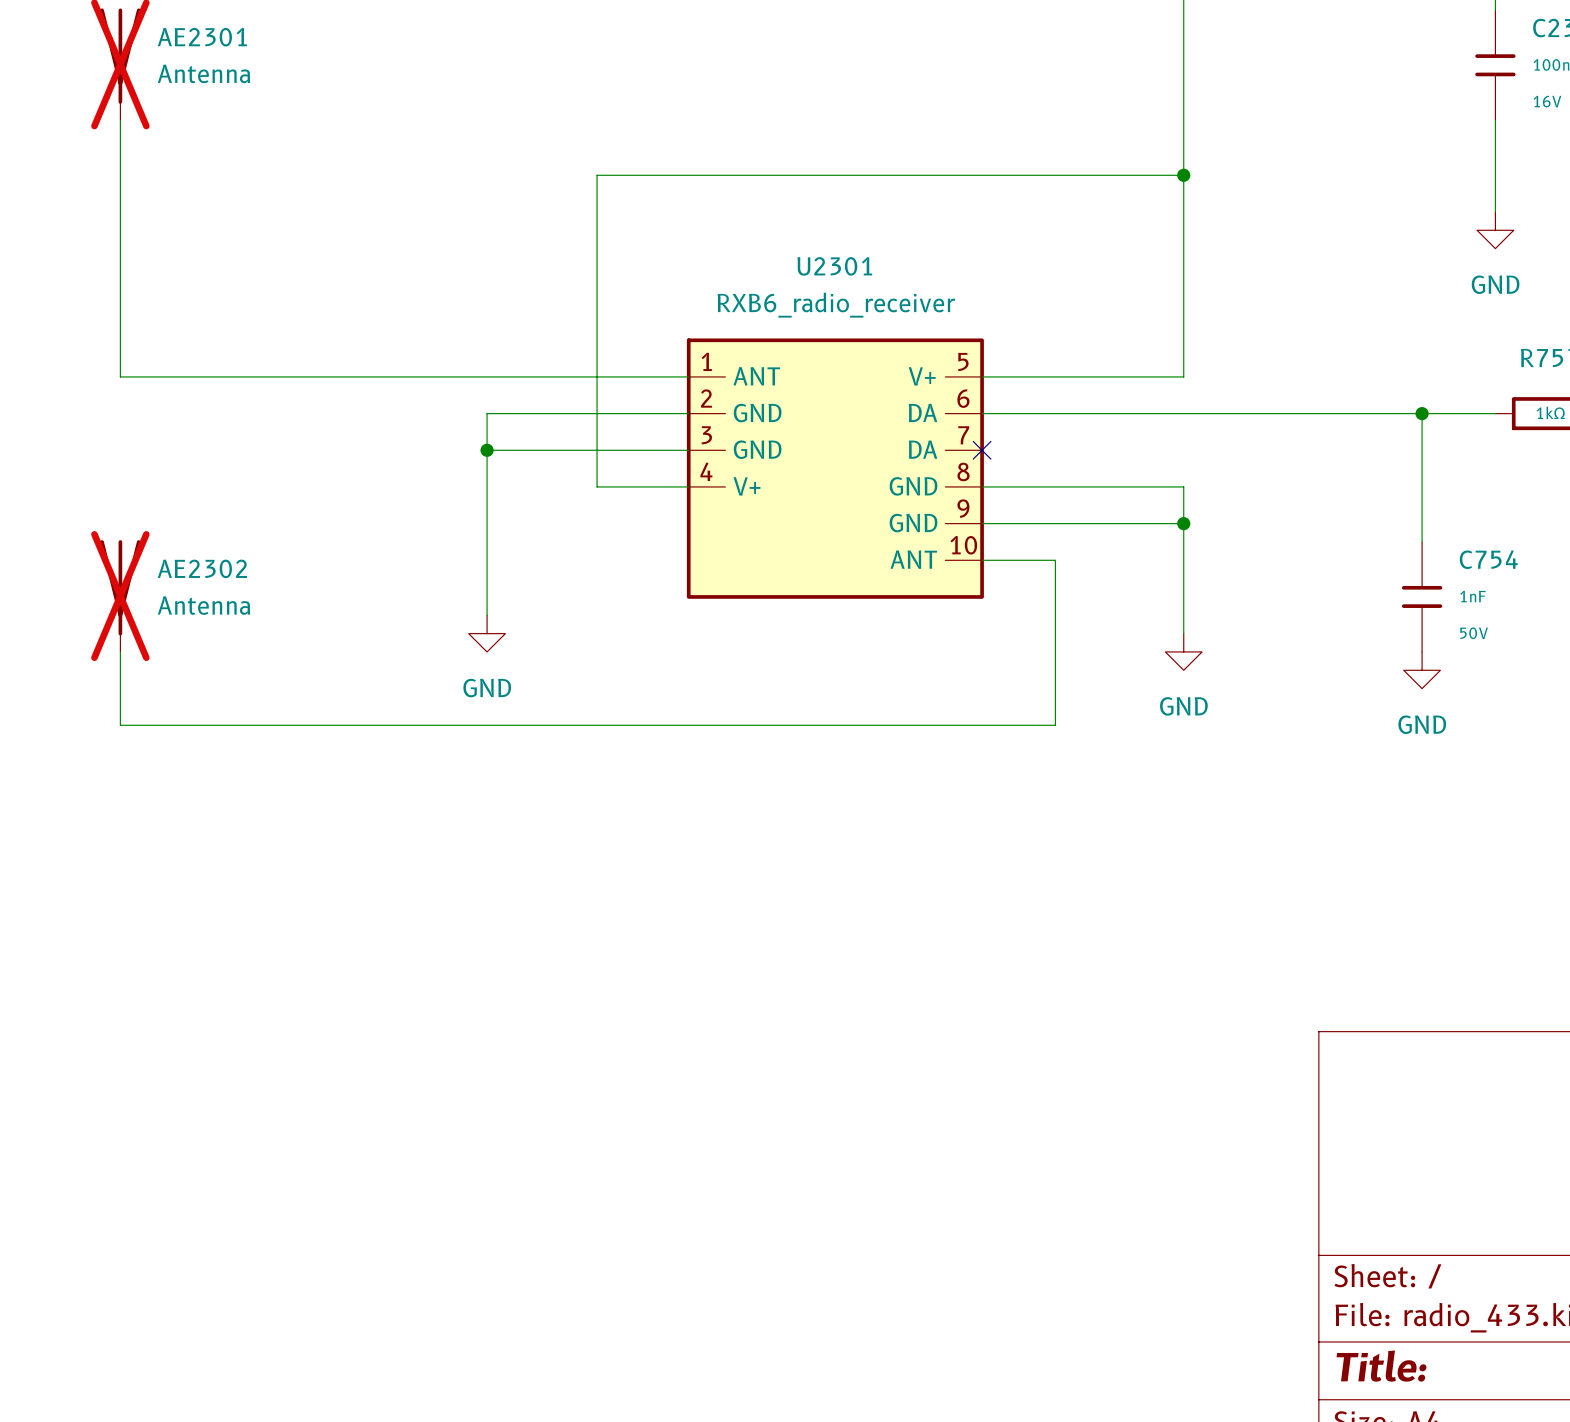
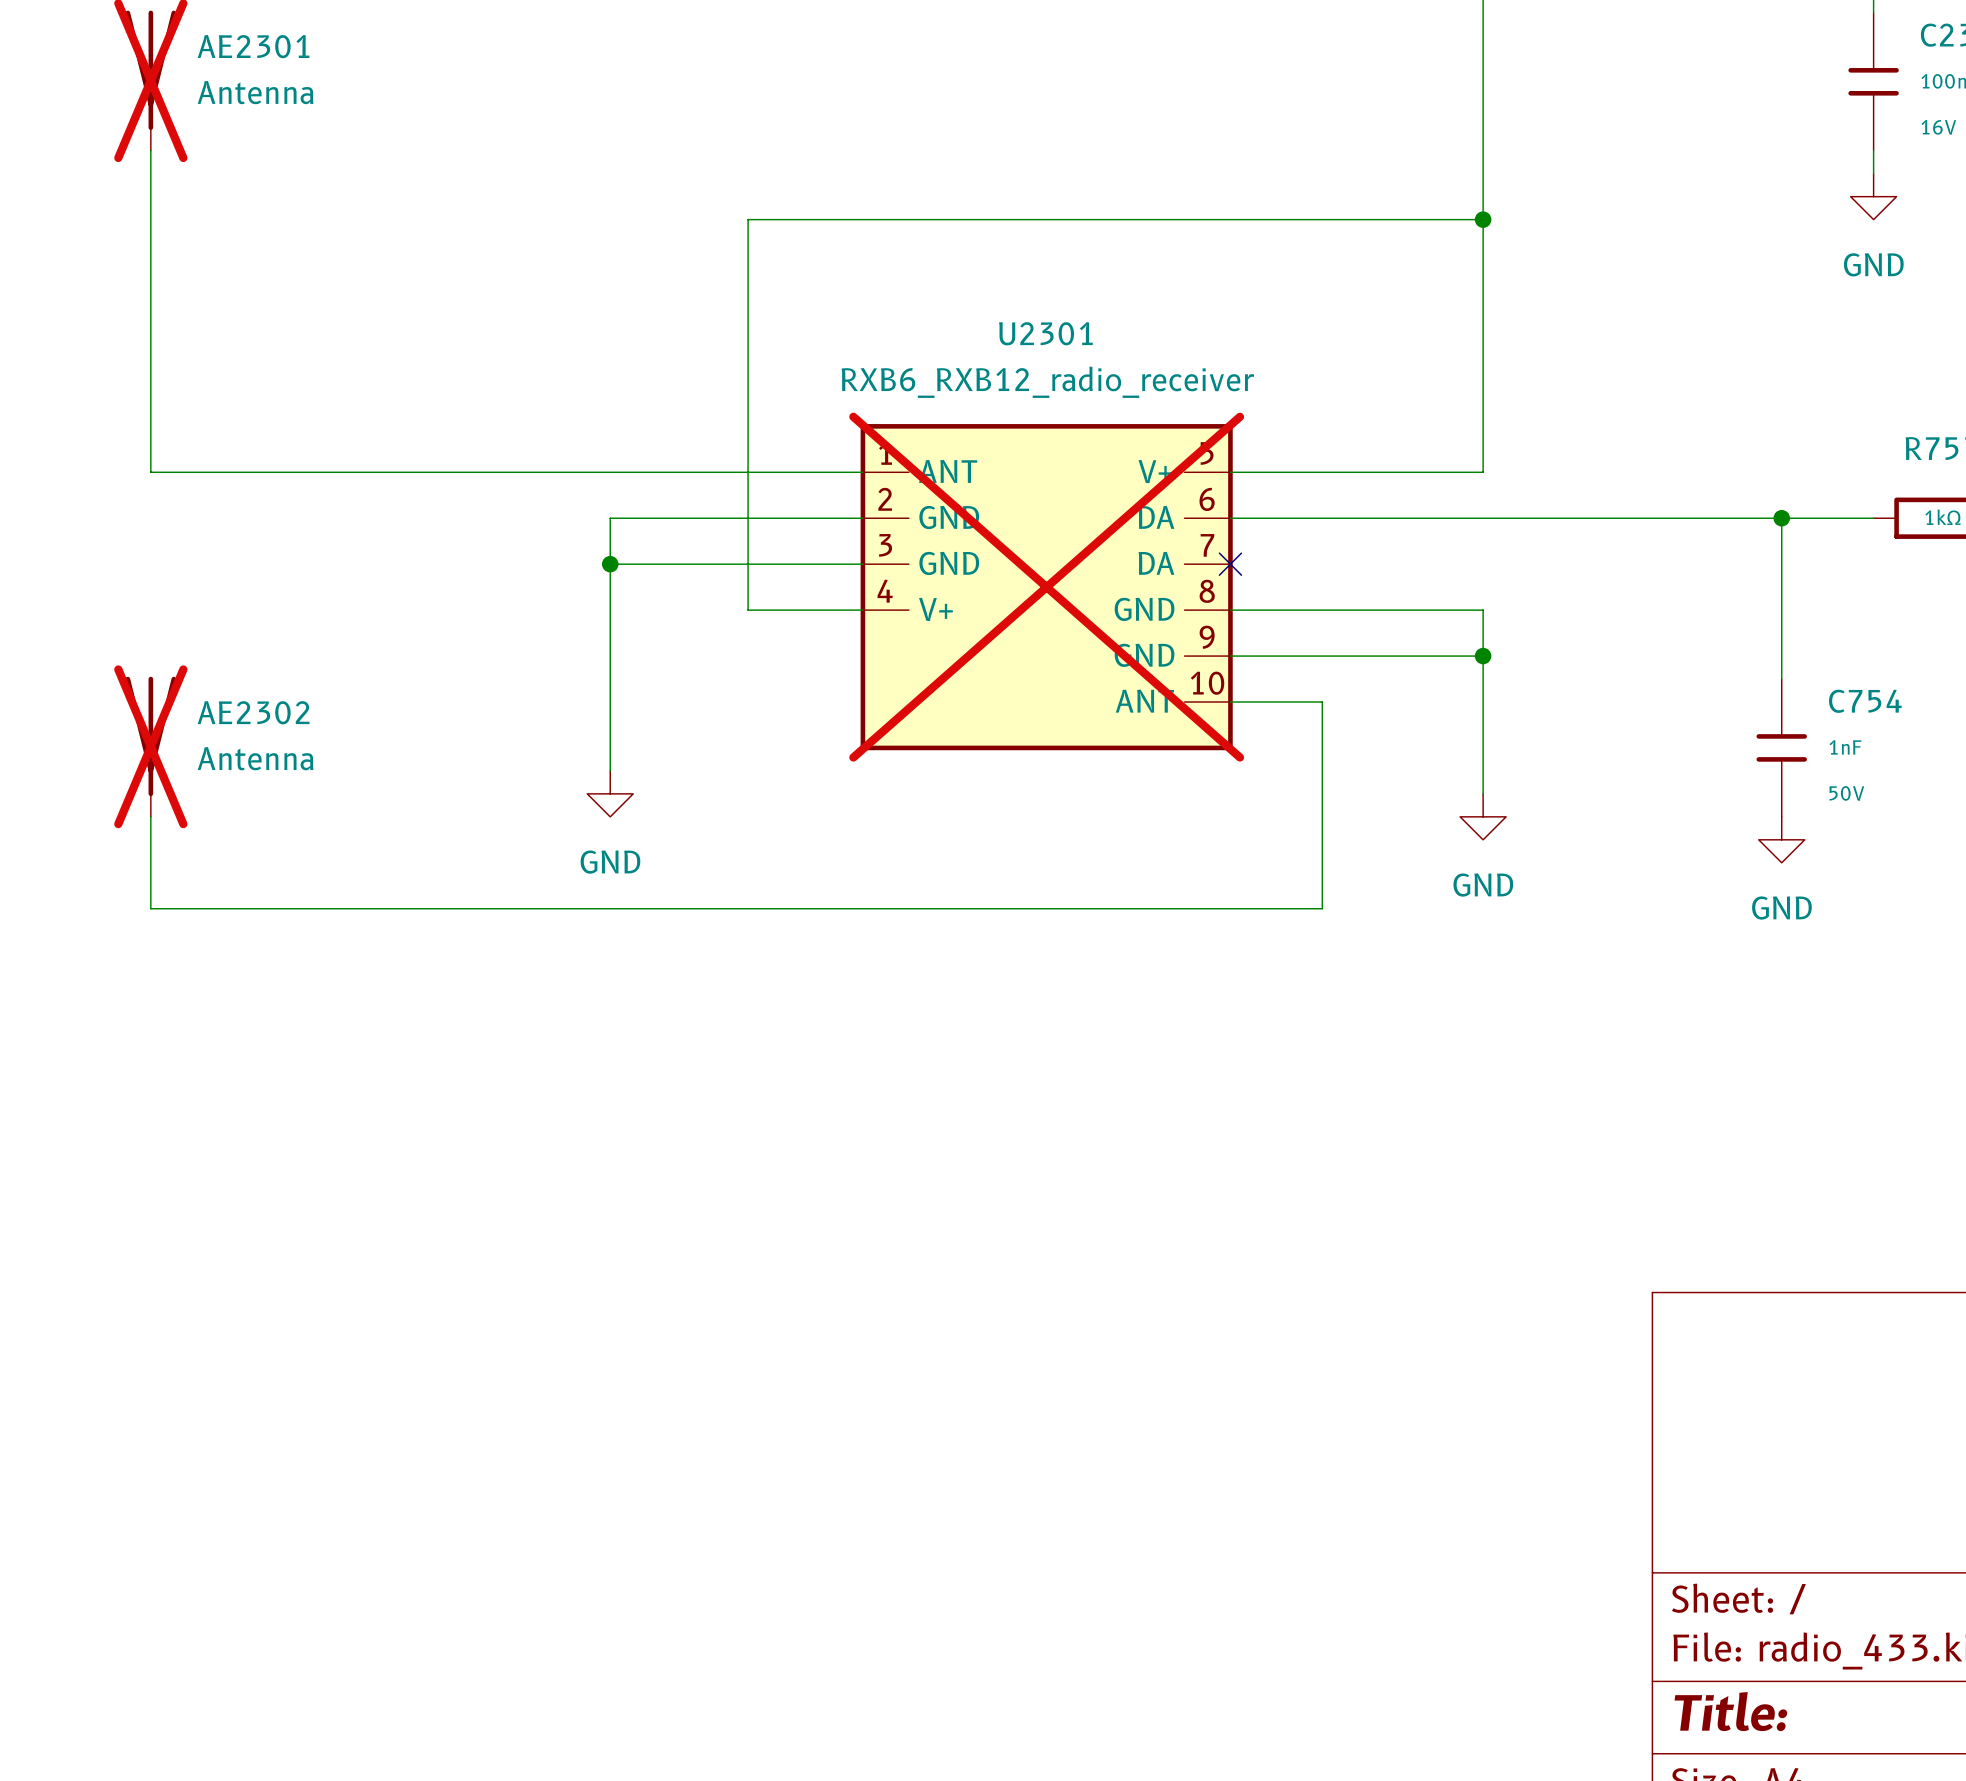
wire: (1495, 138) (1495, 211) -> none
power symbol position: GND (1495, 230) -> GND (1873, 196)
U2301 value: RXB6_radio_receiver (836, 305) -> RXB6_RXB12_radio_receiver (1047, 382)
U2301 do-not-place cross: none -> (1046, 587)

